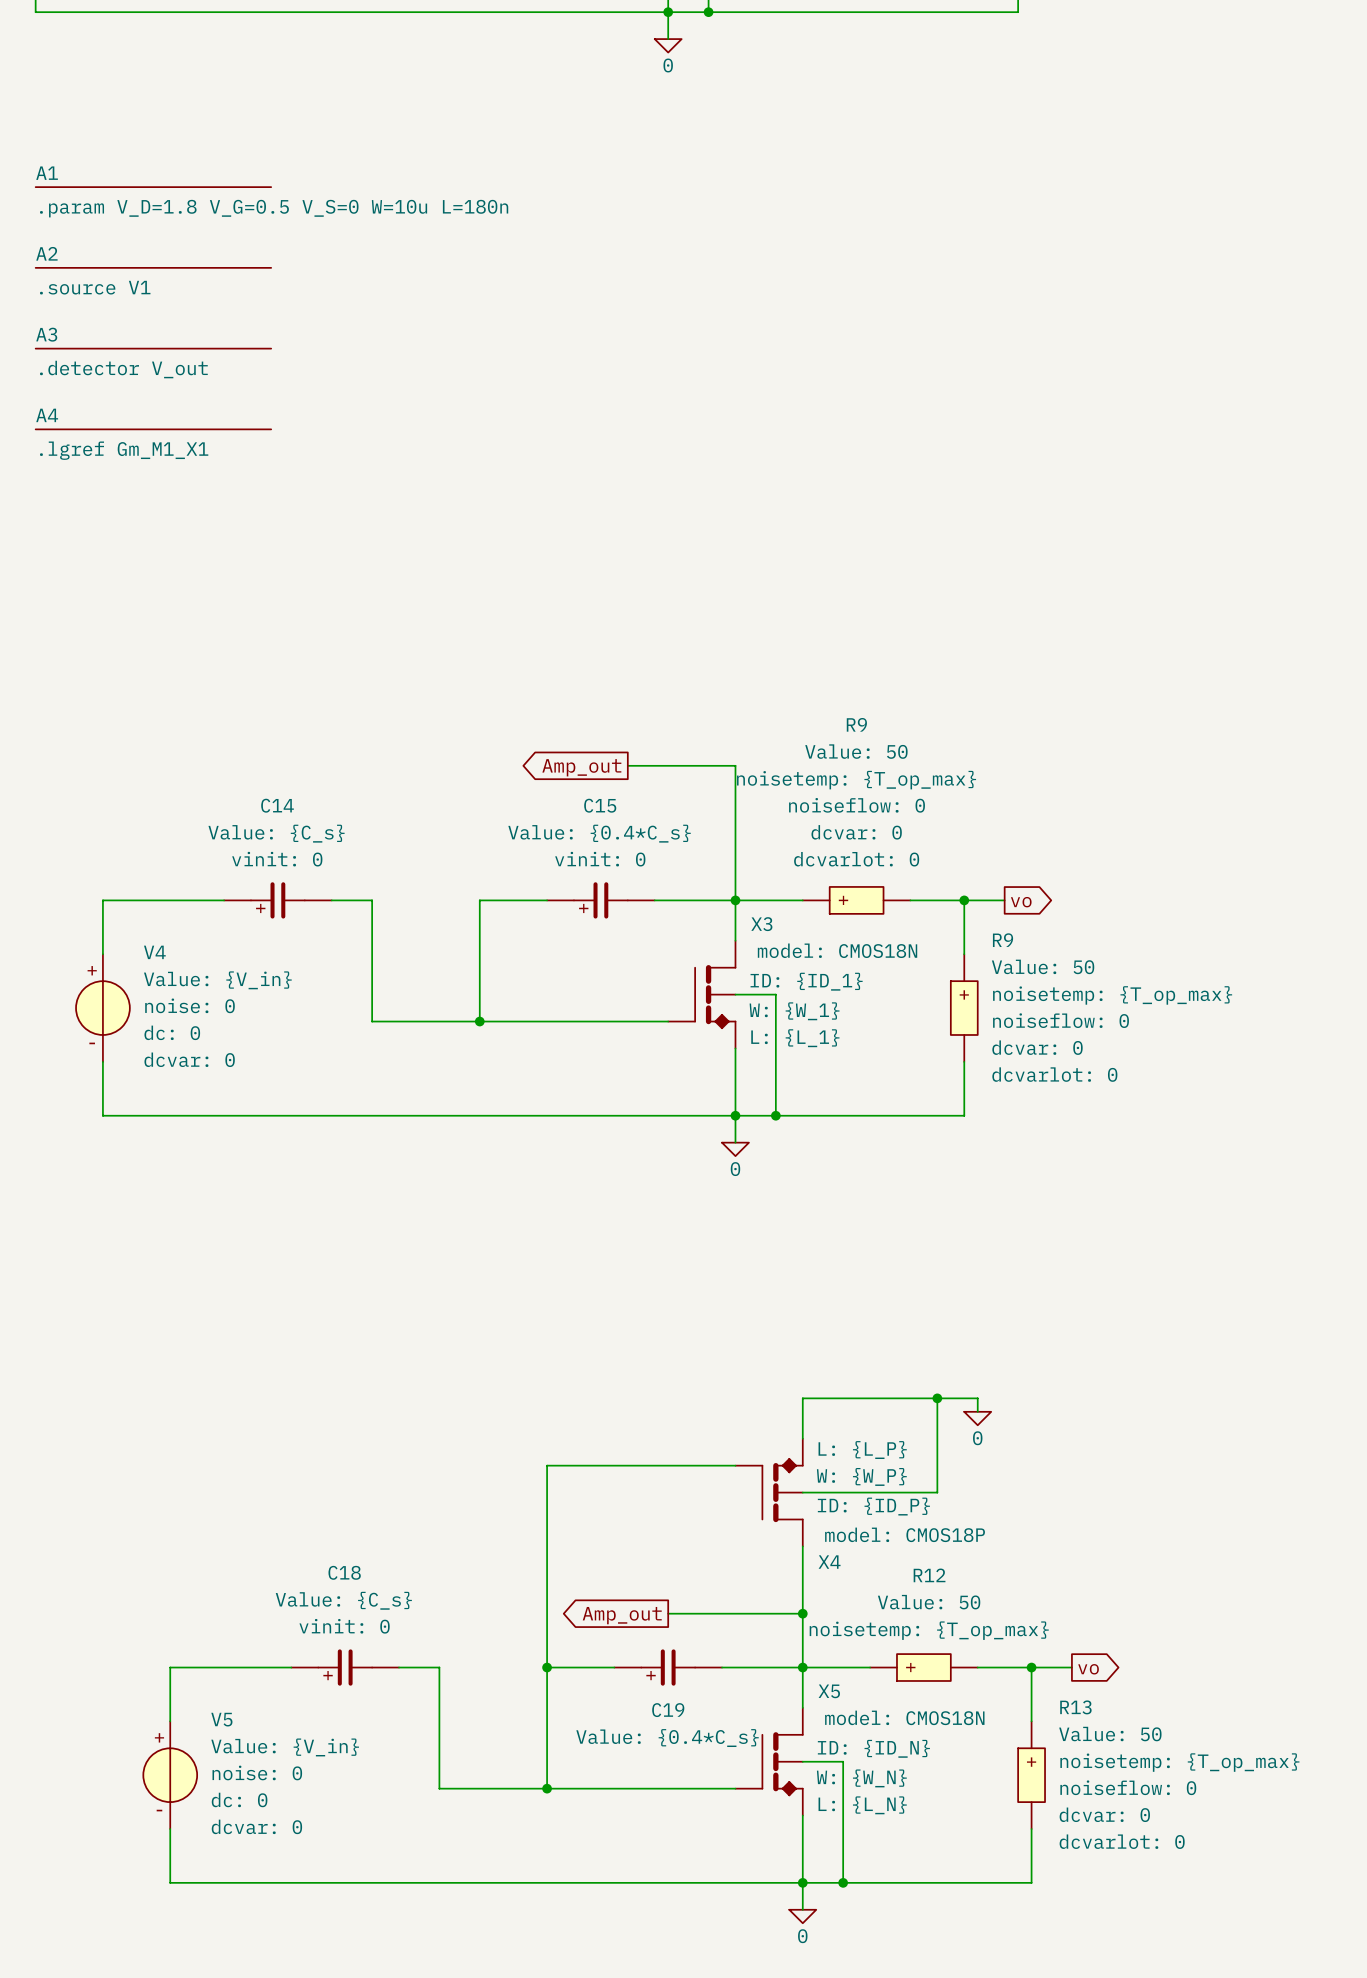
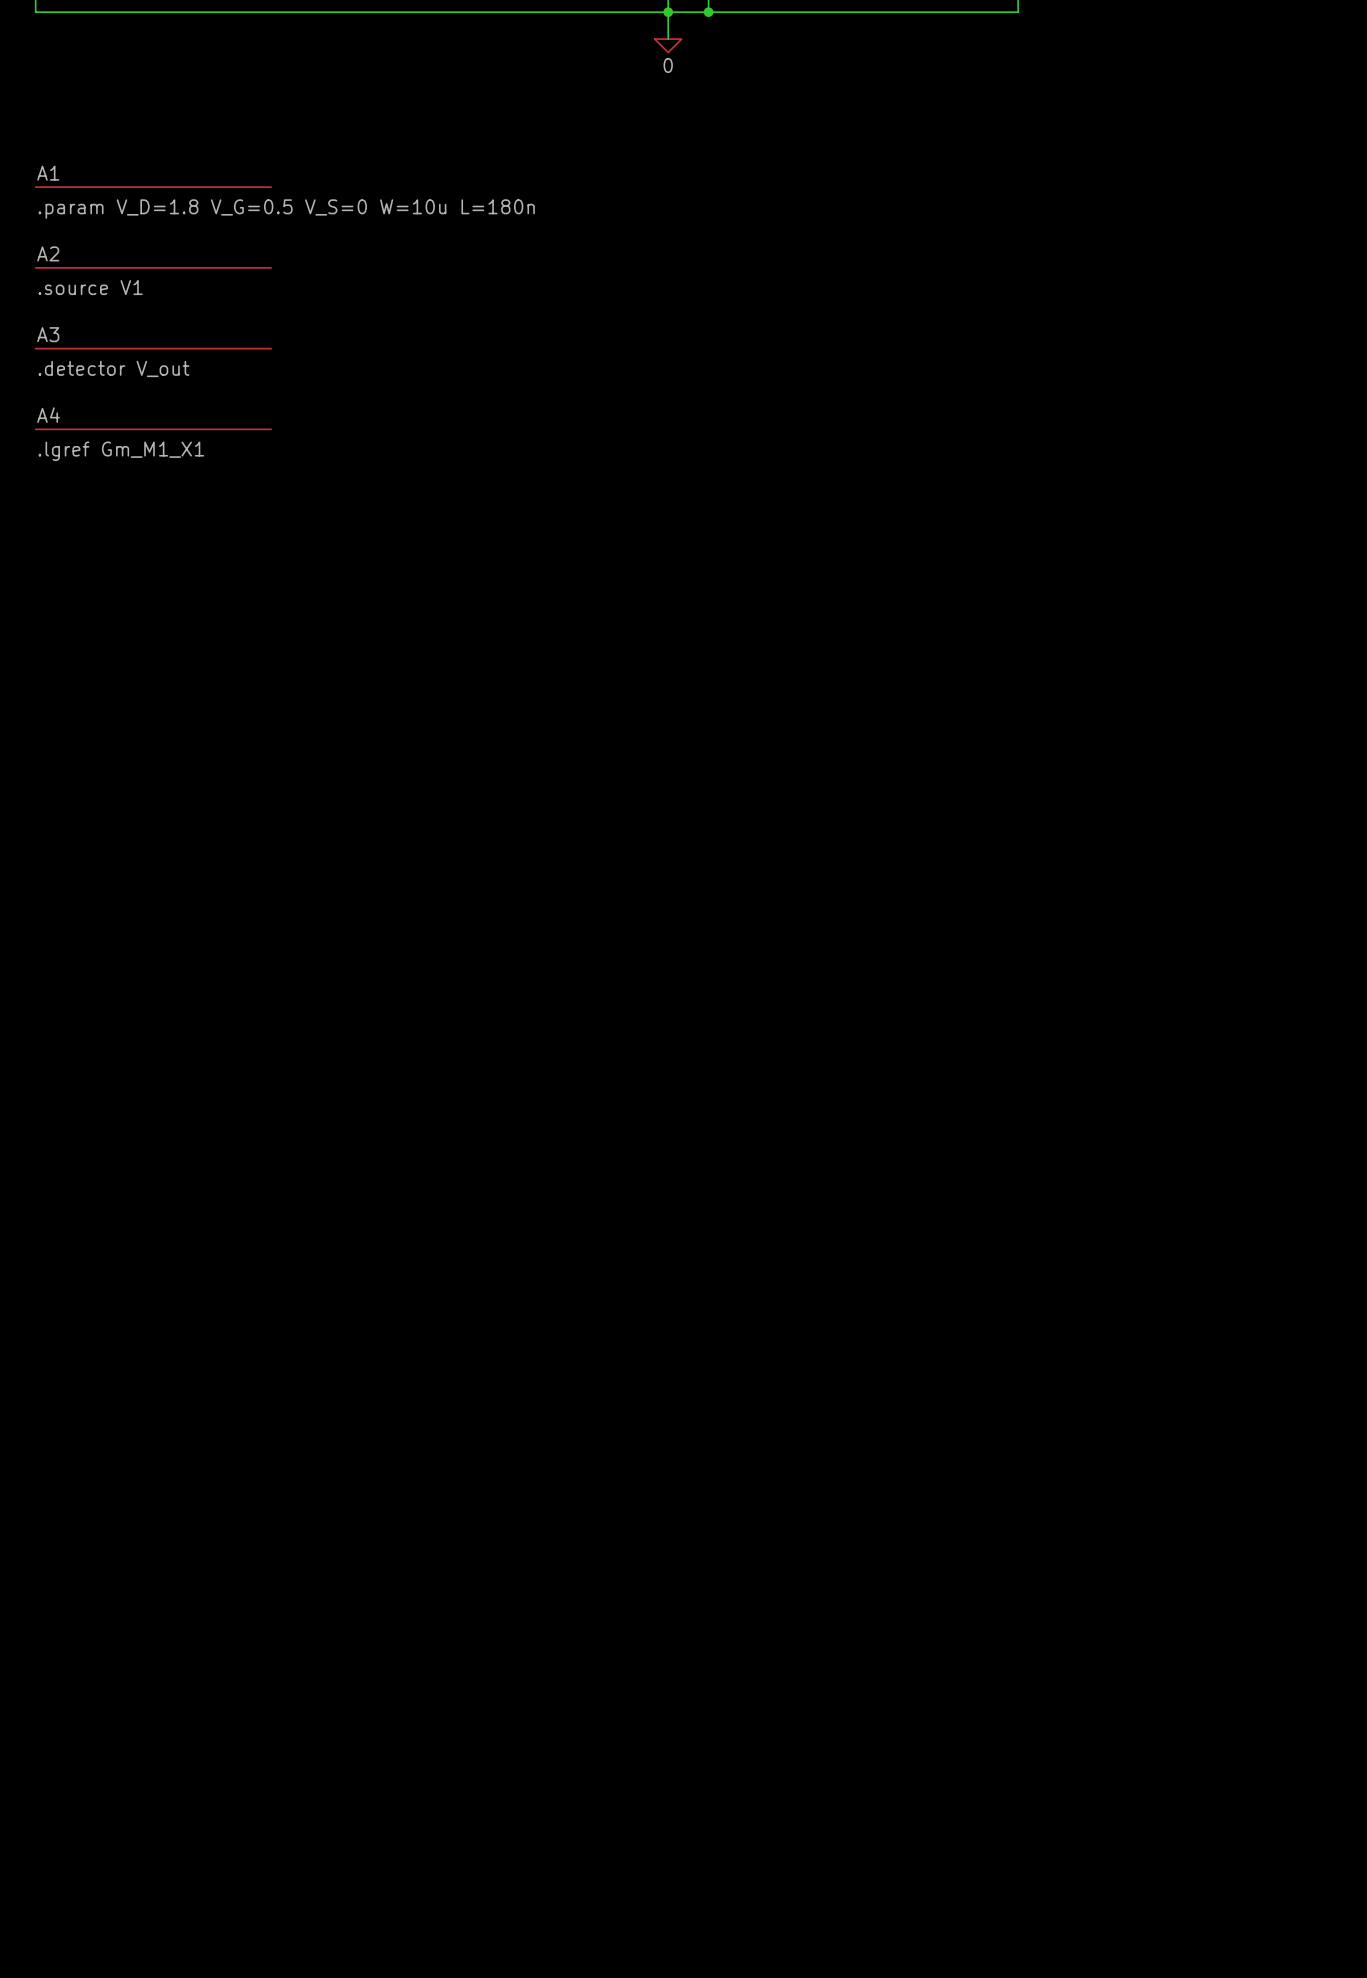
wire: (627, 765) (735, 765) (735, 940) -> none
global label: Amp_out (581, 767) -> none
wire: (224, 900) (102, 900) (102, 954) -> none
C14: Value: {C_s} (277, 900) -> none
wire: (331, 900) (372, 900) (372, 1021) (668, 1021) -> none
wire: (547, 900) (479, 900) (479, 1021) -> none
C15: Value: {0.4*C_s} (600, 900) -> none
wire: (654, 900) (802, 900) -> none
junction: (735, 900) -> none
R9: Value: 50 (856, 900) -> none
wire: (910, 900) (1004, 900) -> none
wire: (964, 900) (964, 954) -> none
junction: (964, 900) -> none
global label: vo (1021, 902) -> none
X3: (701, 994) -> none
wire: (735, 994) (775, 994) (775, 1115) -> none
V4: Value: {V_in} (102, 1008) -> none
R9: Value: 50 (964, 1008) -> none
junction: (479, 1021) -> none
wire: (735, 1048) (735, 1142) -> none
wire: (102, 1061) (102, 1115) (964, 1115) (964, 1061) -> none
junction: (735, 1115) -> none
junction: (775, 1115) -> none
power symbol: 0 (735, 1149) -> none
wire: (937, 1398) (937, 1492) (802, 1492) -> none
junction: (937, 1398) -> none
wire: (977, 1411) (977, 1398) (802, 1398) (802, 1438) -> none
power symbol: 0 (977, 1418) -> none
wire: (735, 1465) (547, 1465) (547, 1788) -> none
X4: (769, 1492) -> none
wire: (802, 1546) (802, 1707) -> none
wire: (668, 1613) (802, 1613) -> none
junction: (802, 1613) -> none
global label: Amp_out (622, 1615) -> none
wire: (291, 1667) (170, 1667) (170, 1721) -> none
C18: Value: {C_s} (345, 1667) -> none
wire: (399, 1667) (439, 1667) (439, 1788) (735, 1788) -> none
wire: (547, 1667) (614, 1667) -> none
junction: (547, 1667) -> none
C19: Value: {0.4*C_s} (668, 1667) -> none
wire: (722, 1667) (870, 1667) -> none
junction: (802, 1667) -> none
R12: Value: 50 (923, 1667) -> none
wire: (977, 1667) (1071, 1667) -> none
wire: (1031, 1667) (1031, 1721) -> none
junction: (1031, 1667) -> none
global label: vo (1088, 1669) -> none
X5: (769, 1761) -> none
wire: (802, 1761) (843, 1761) (843, 1882) -> none
V5: Value: {V_in} (170, 1775) -> none
R13: Value: 50 (1031, 1775) -> none
junction: (547, 1788) -> none
wire: (802, 1815) (802, 1909) -> none
wire: (170, 1829) (170, 1882) (1031, 1882) (1031, 1829) -> none
junction: (802, 1882) -> none
junction: (843, 1882) -> none
power symbol: 0 (802, 1916) -> none

